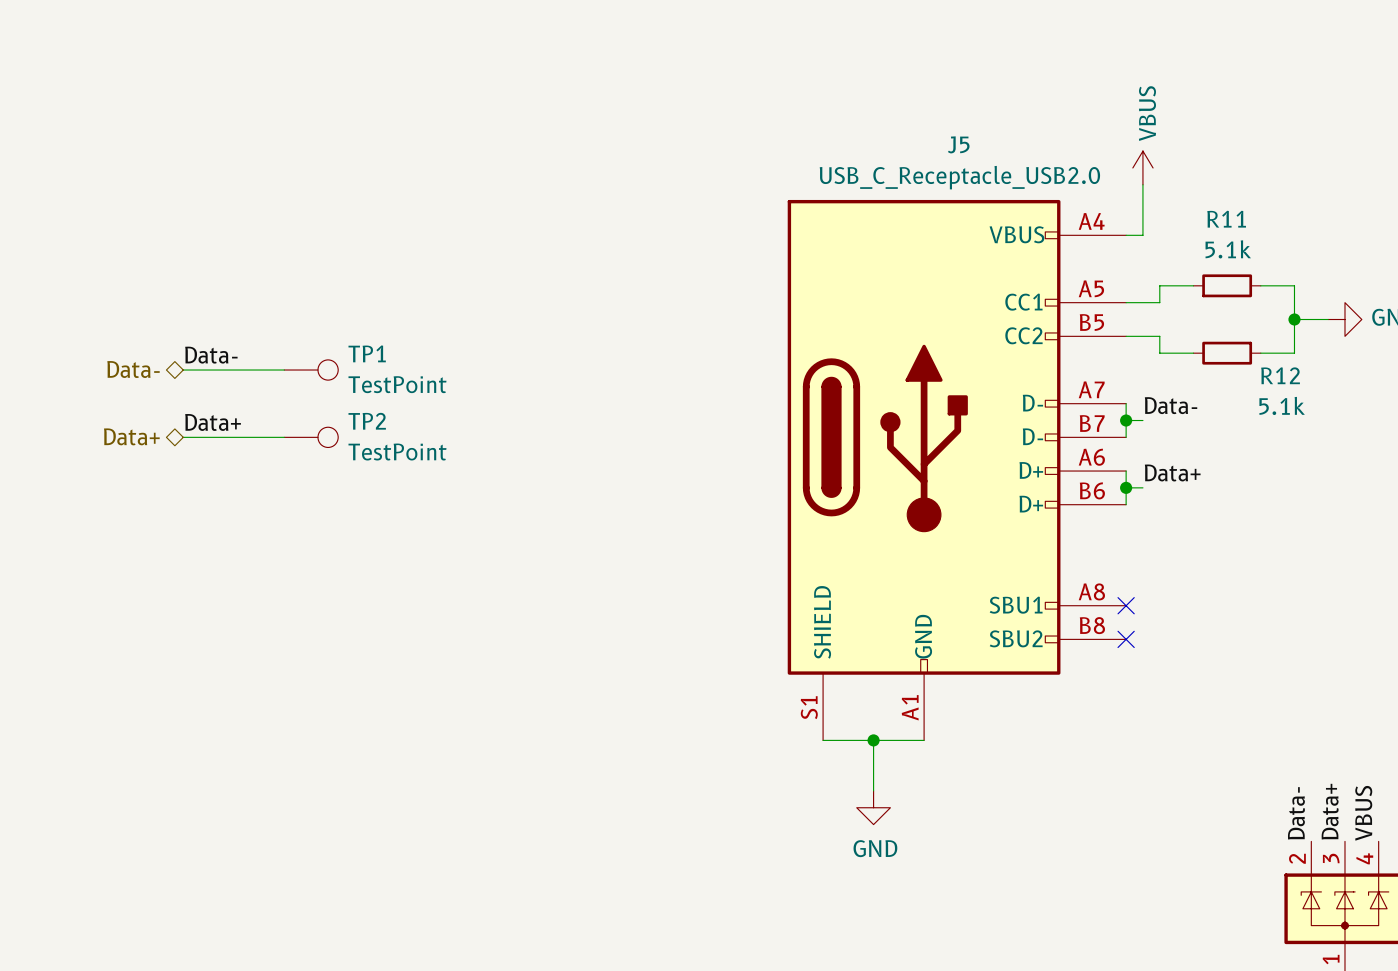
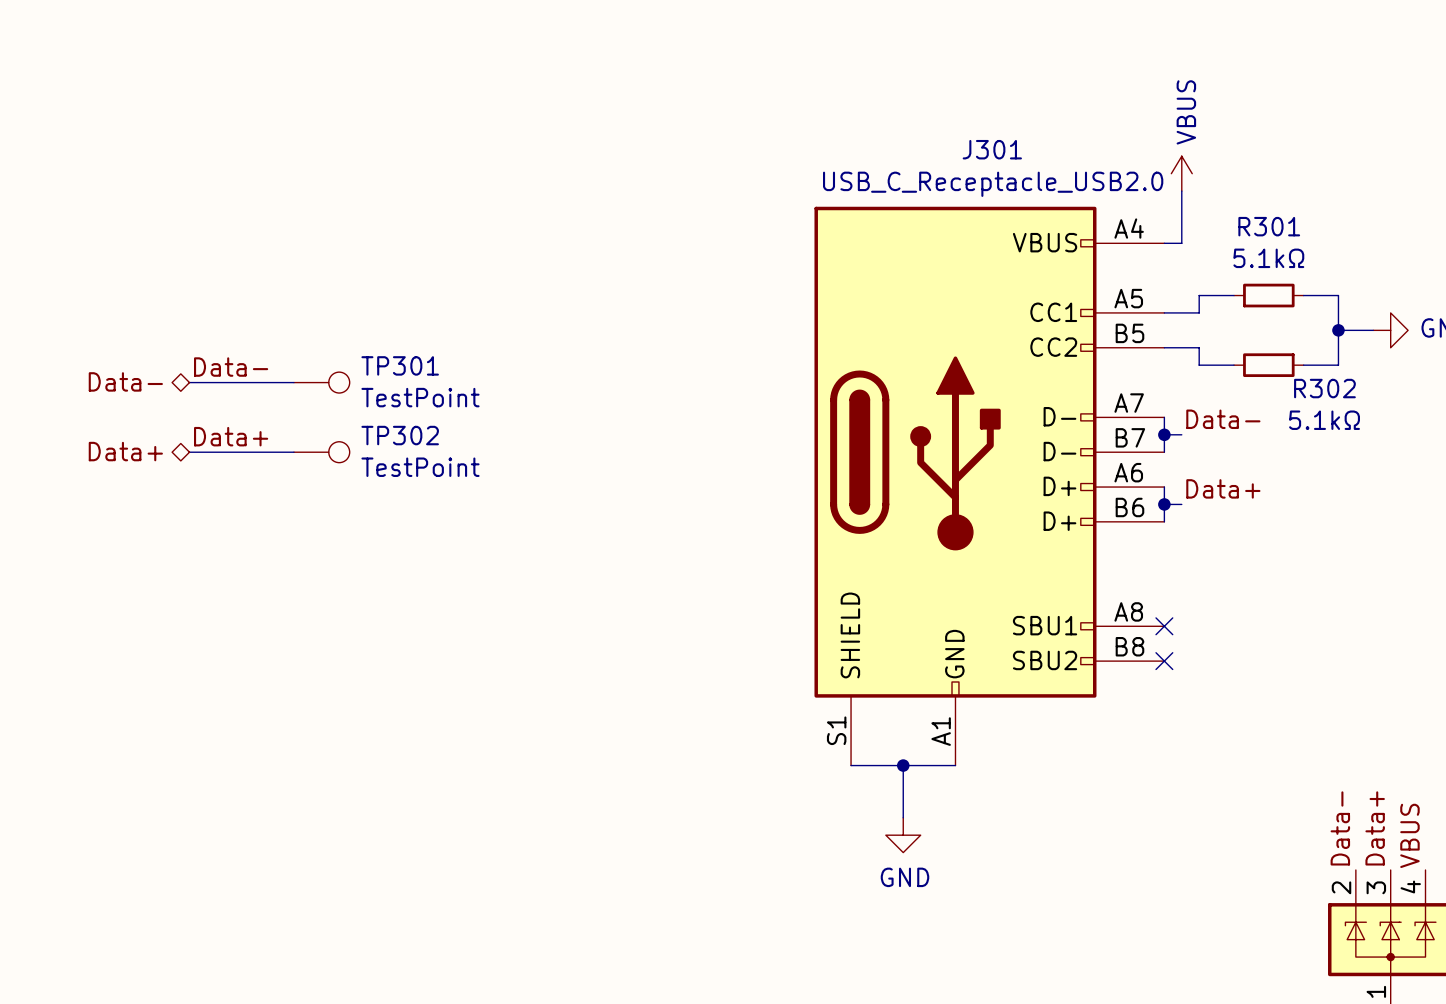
J5 name: J5 (958, 144) -> J301 (992, 149)
R11 name: R11 (1226, 219) -> R301 (1269, 226)
R11 value: 5.1k (1228, 249) -> 5.1kΩ (1268, 258)
TP1 name: TP1 (367, 353) -> TP301 (400, 365)
R12 name: R12 (1280, 375) -> R302 (1324, 388)
R12 value: 5.1k (1282, 405) -> 5.1kΩ (1324, 420)
TP2 name: TP2 (367, 421) -> TP302 (400, 435)

